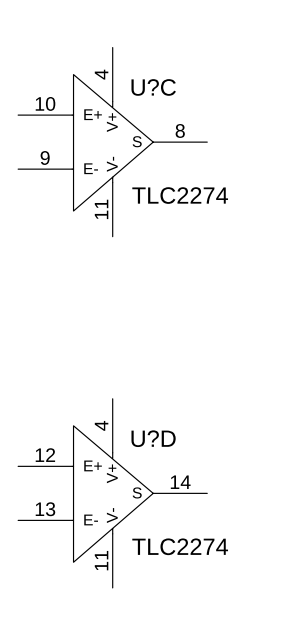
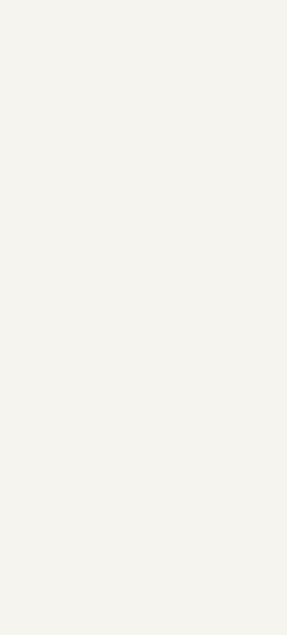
U?C: TLC2274 (112, 142) -> none
U?D: TLC2274 (112, 493) -> none

